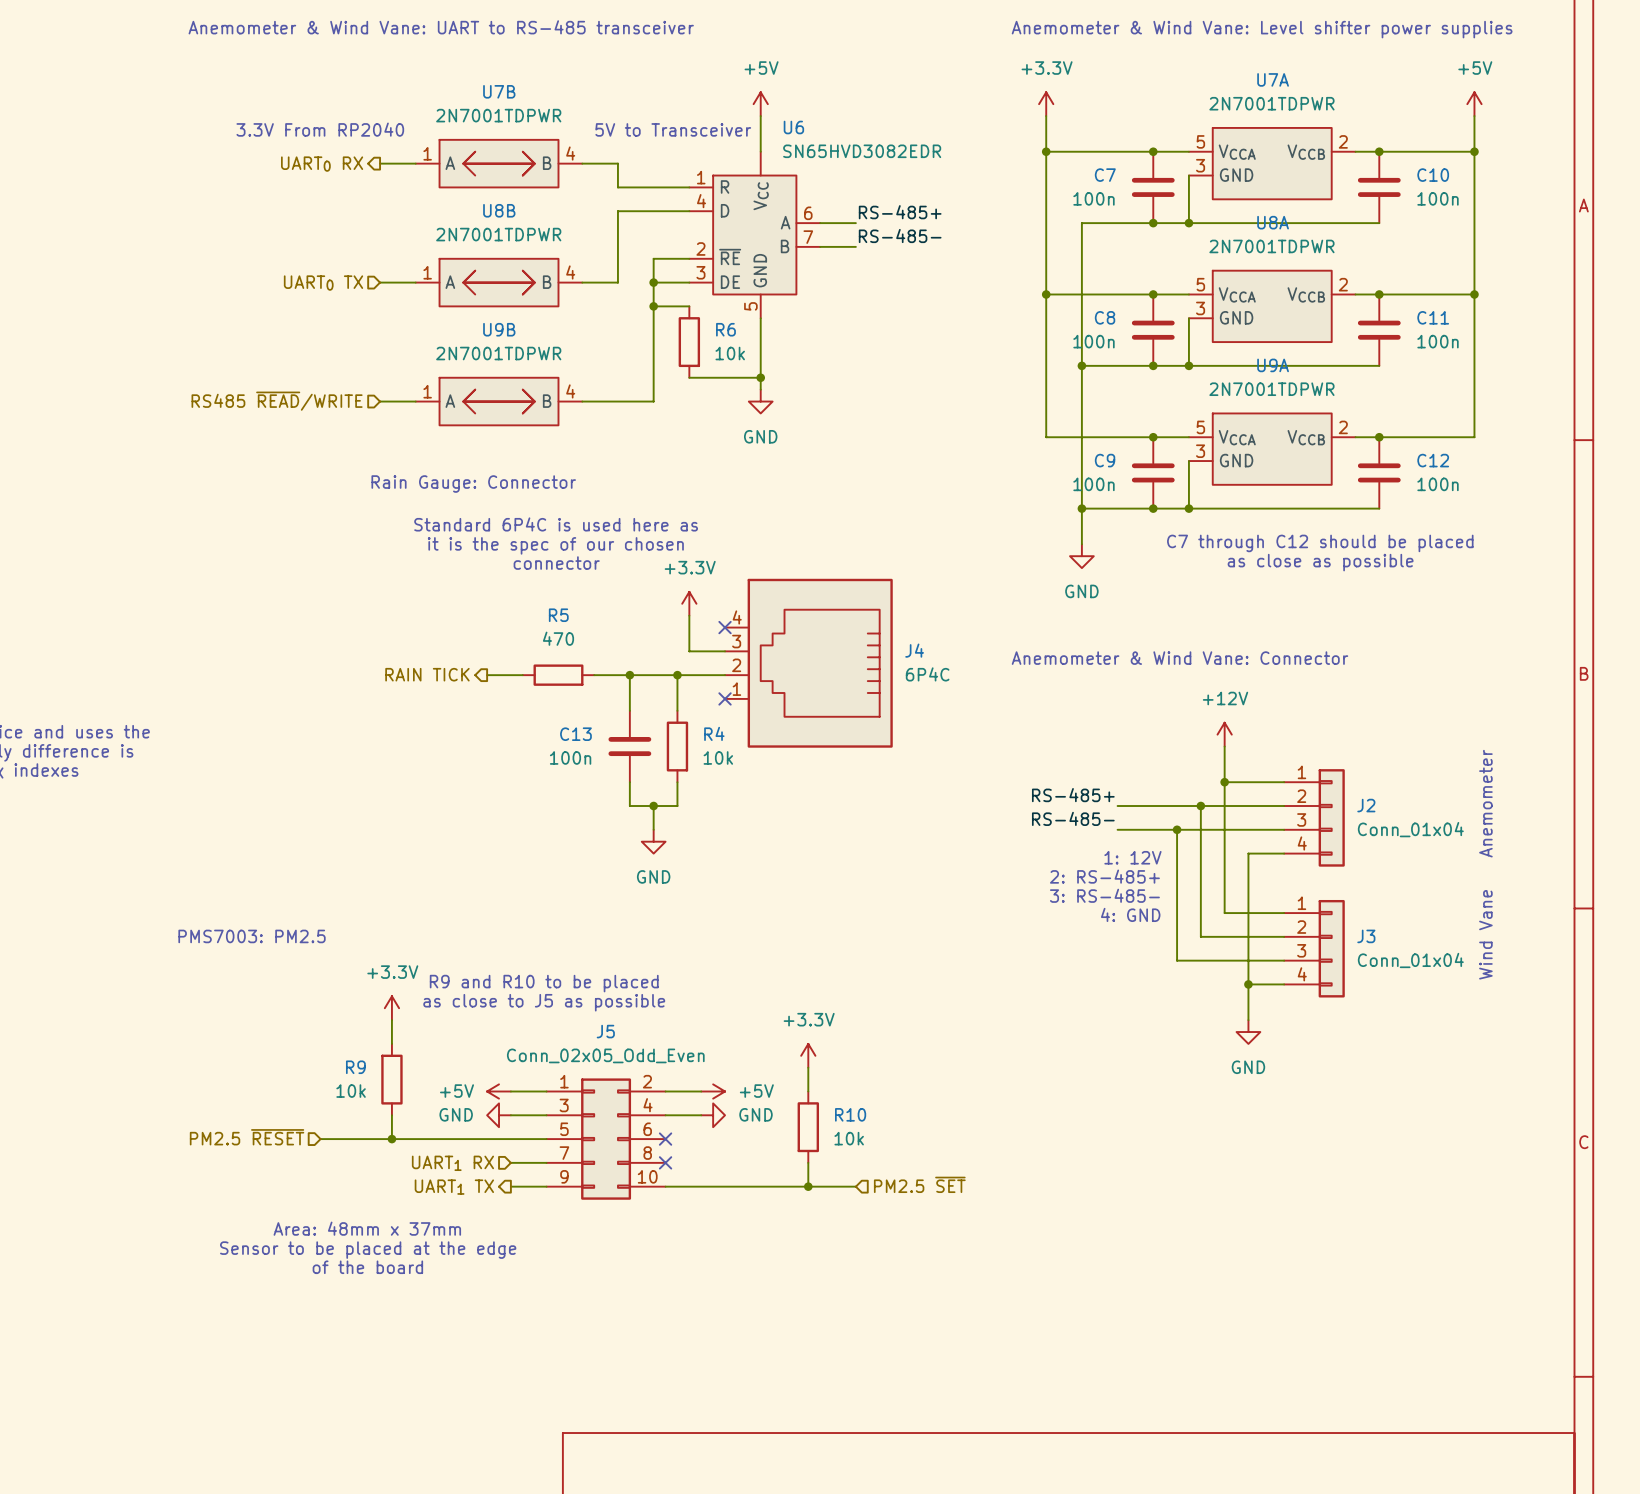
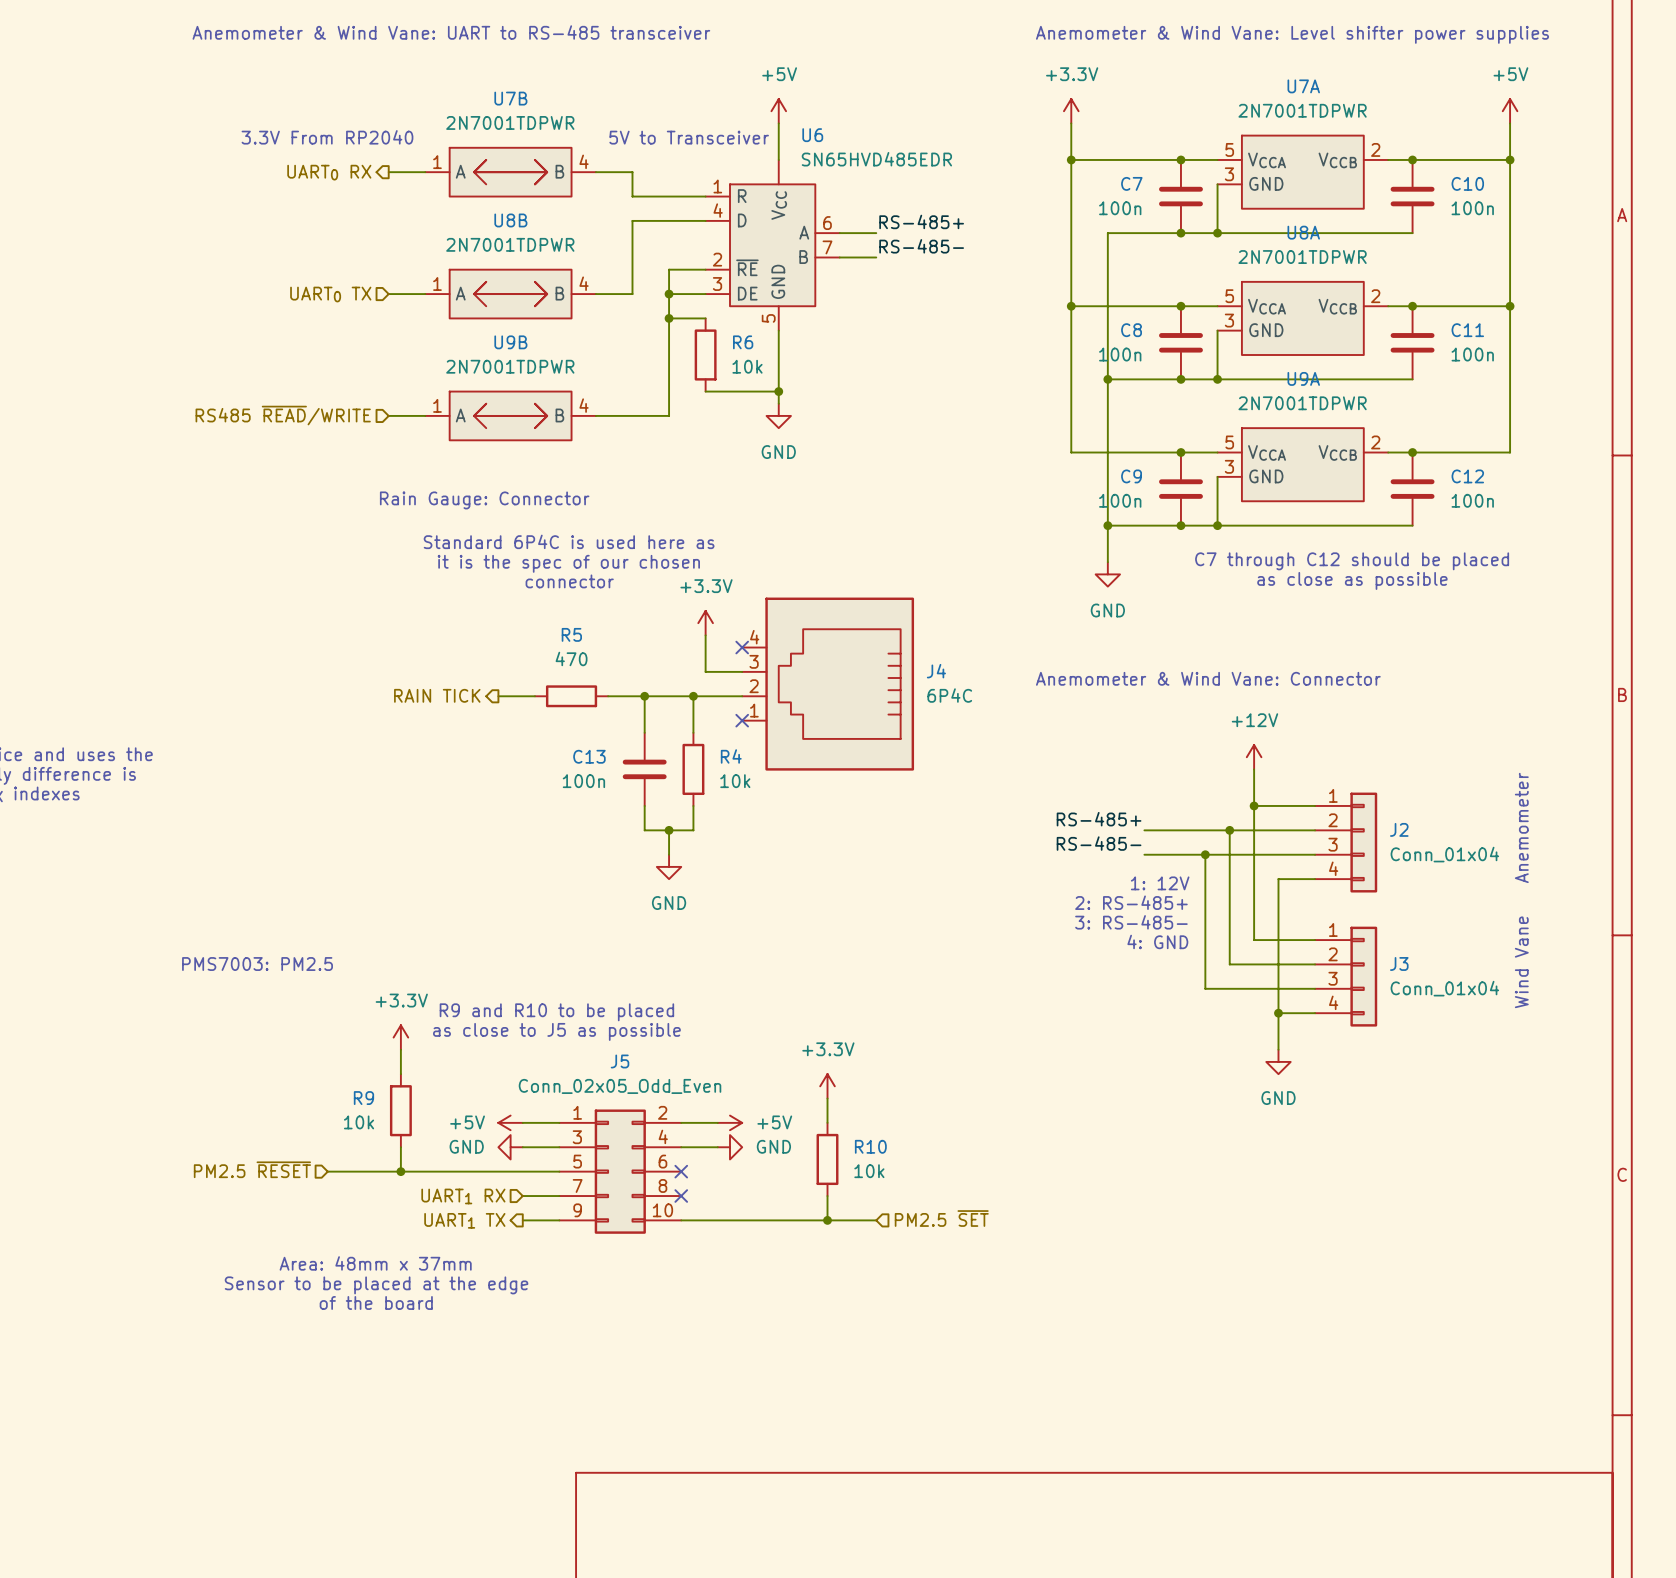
U6 value: SN65HVD3082EDR (862, 151) -> SN65HVD485EDR (876, 159)

